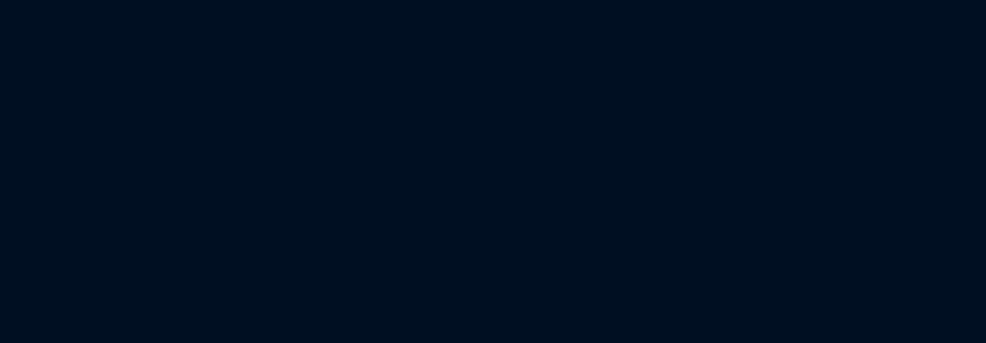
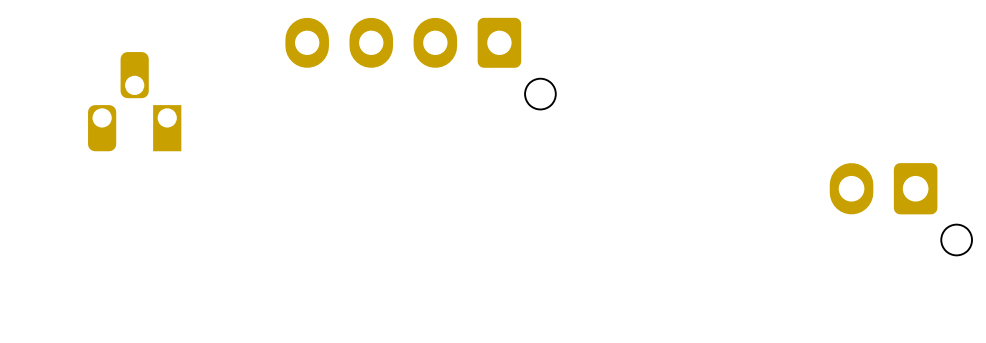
part: none -> (420, 63)
part: none -> (134, 101)
part: none -> (900, 209)

